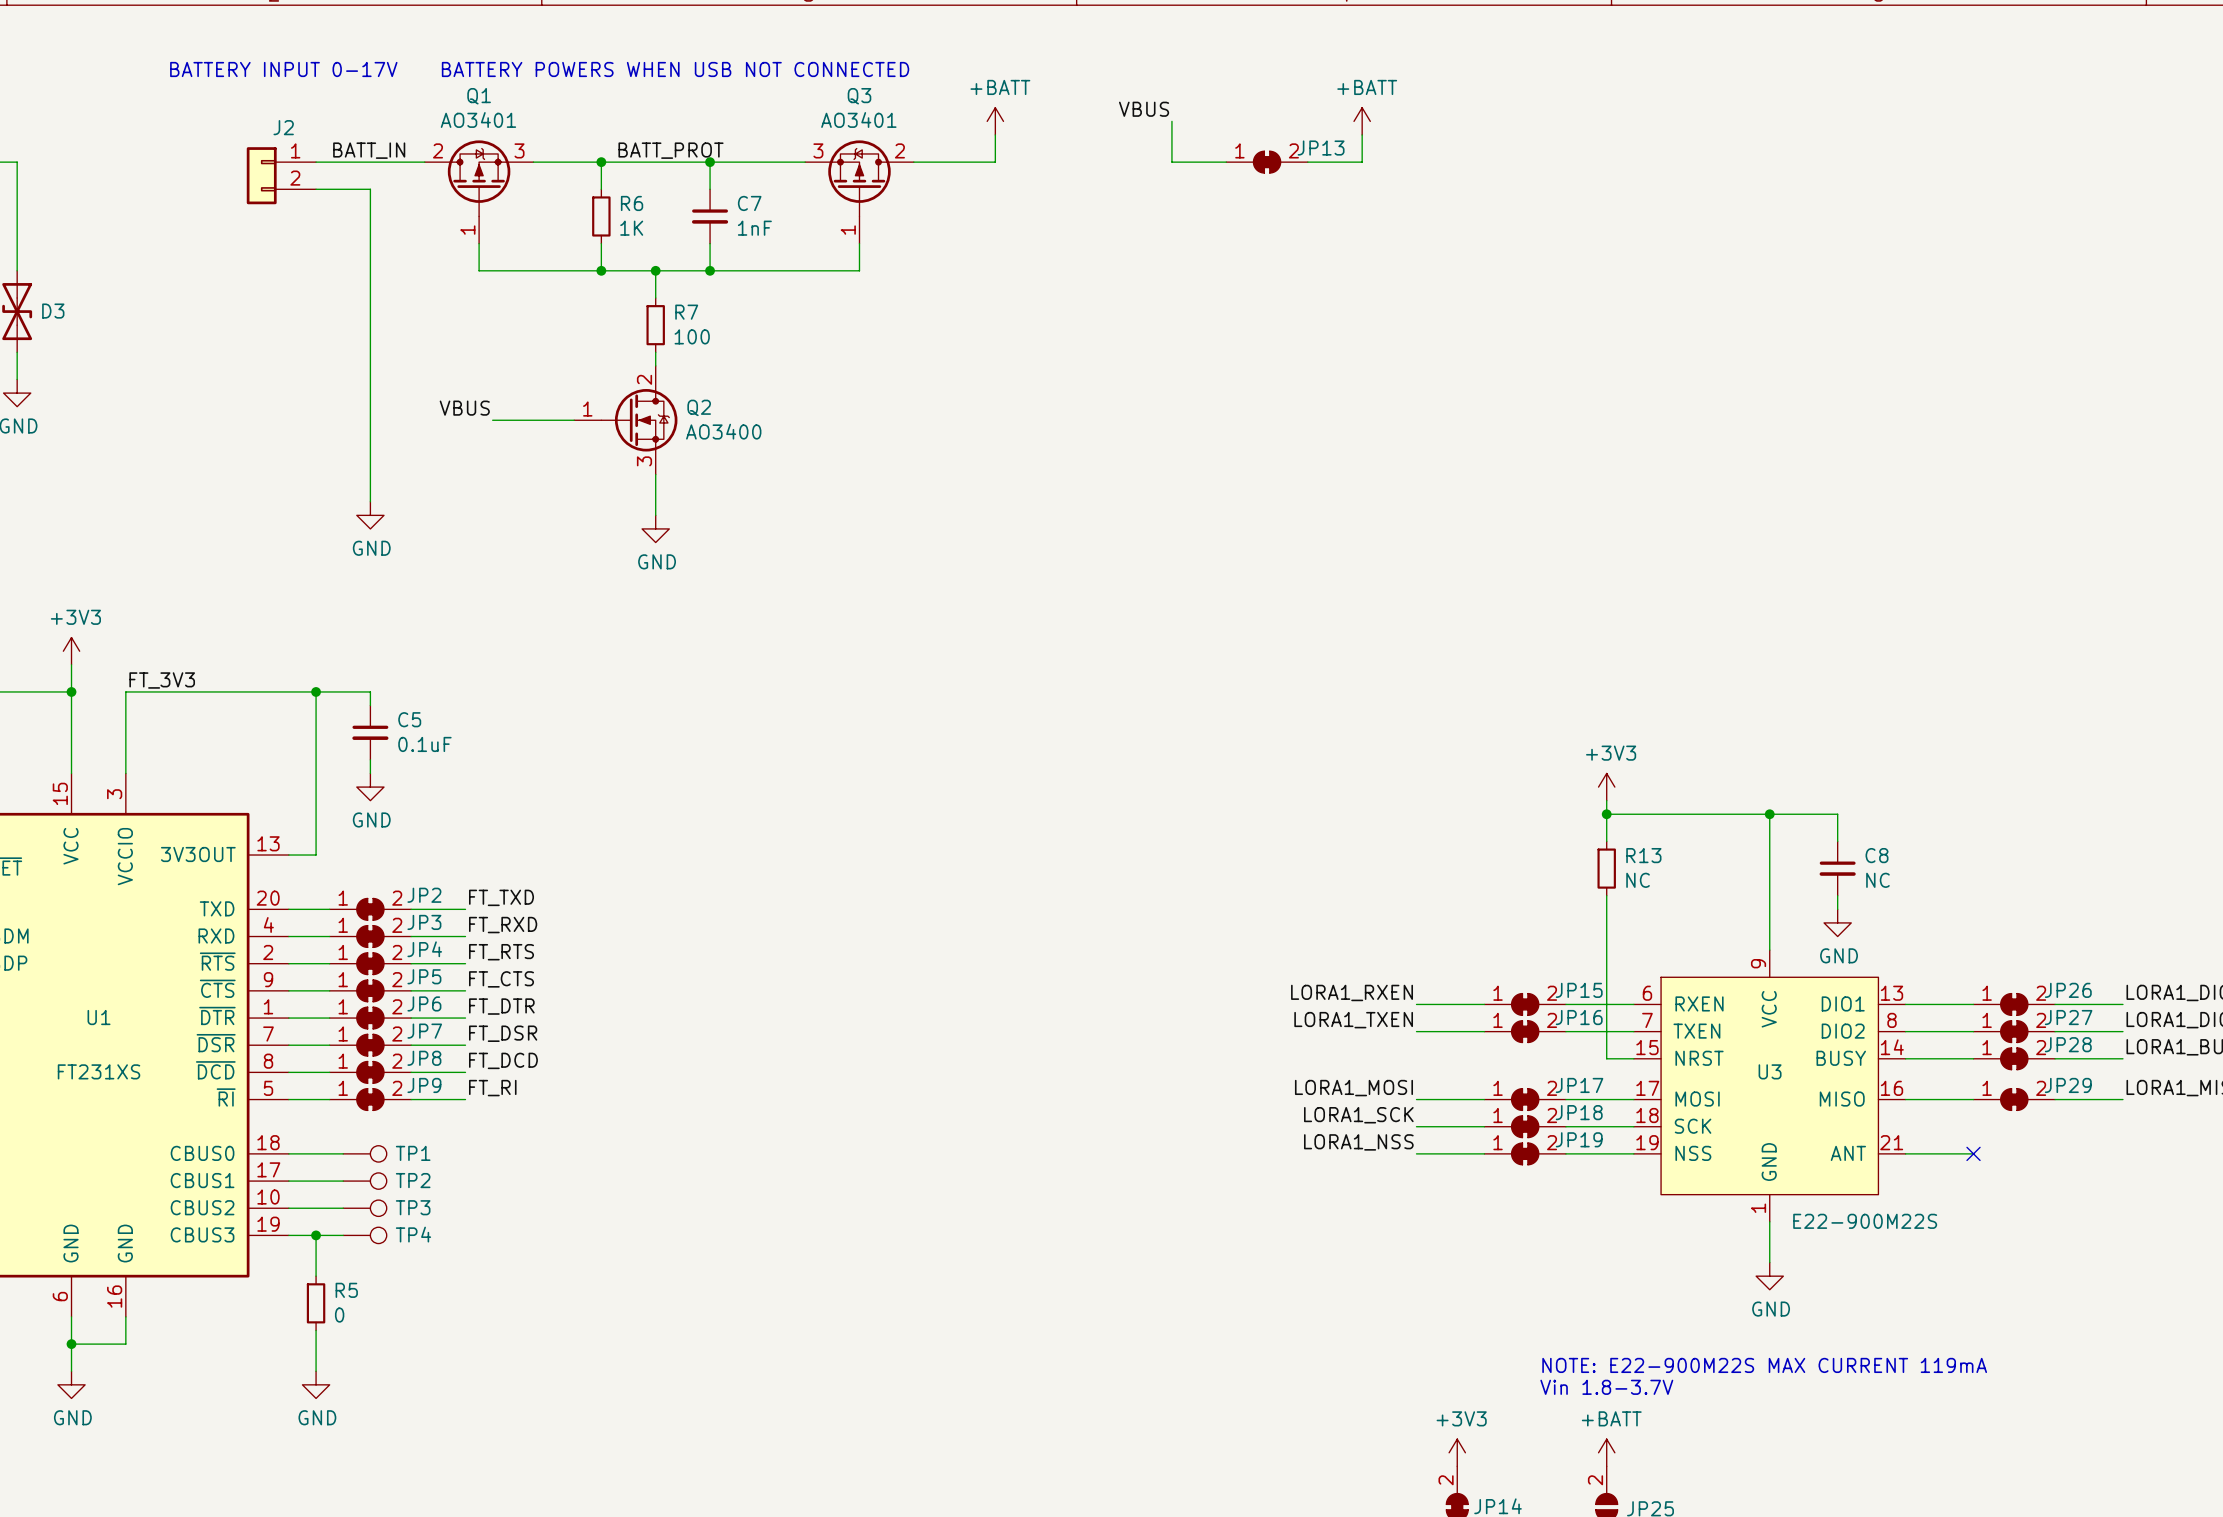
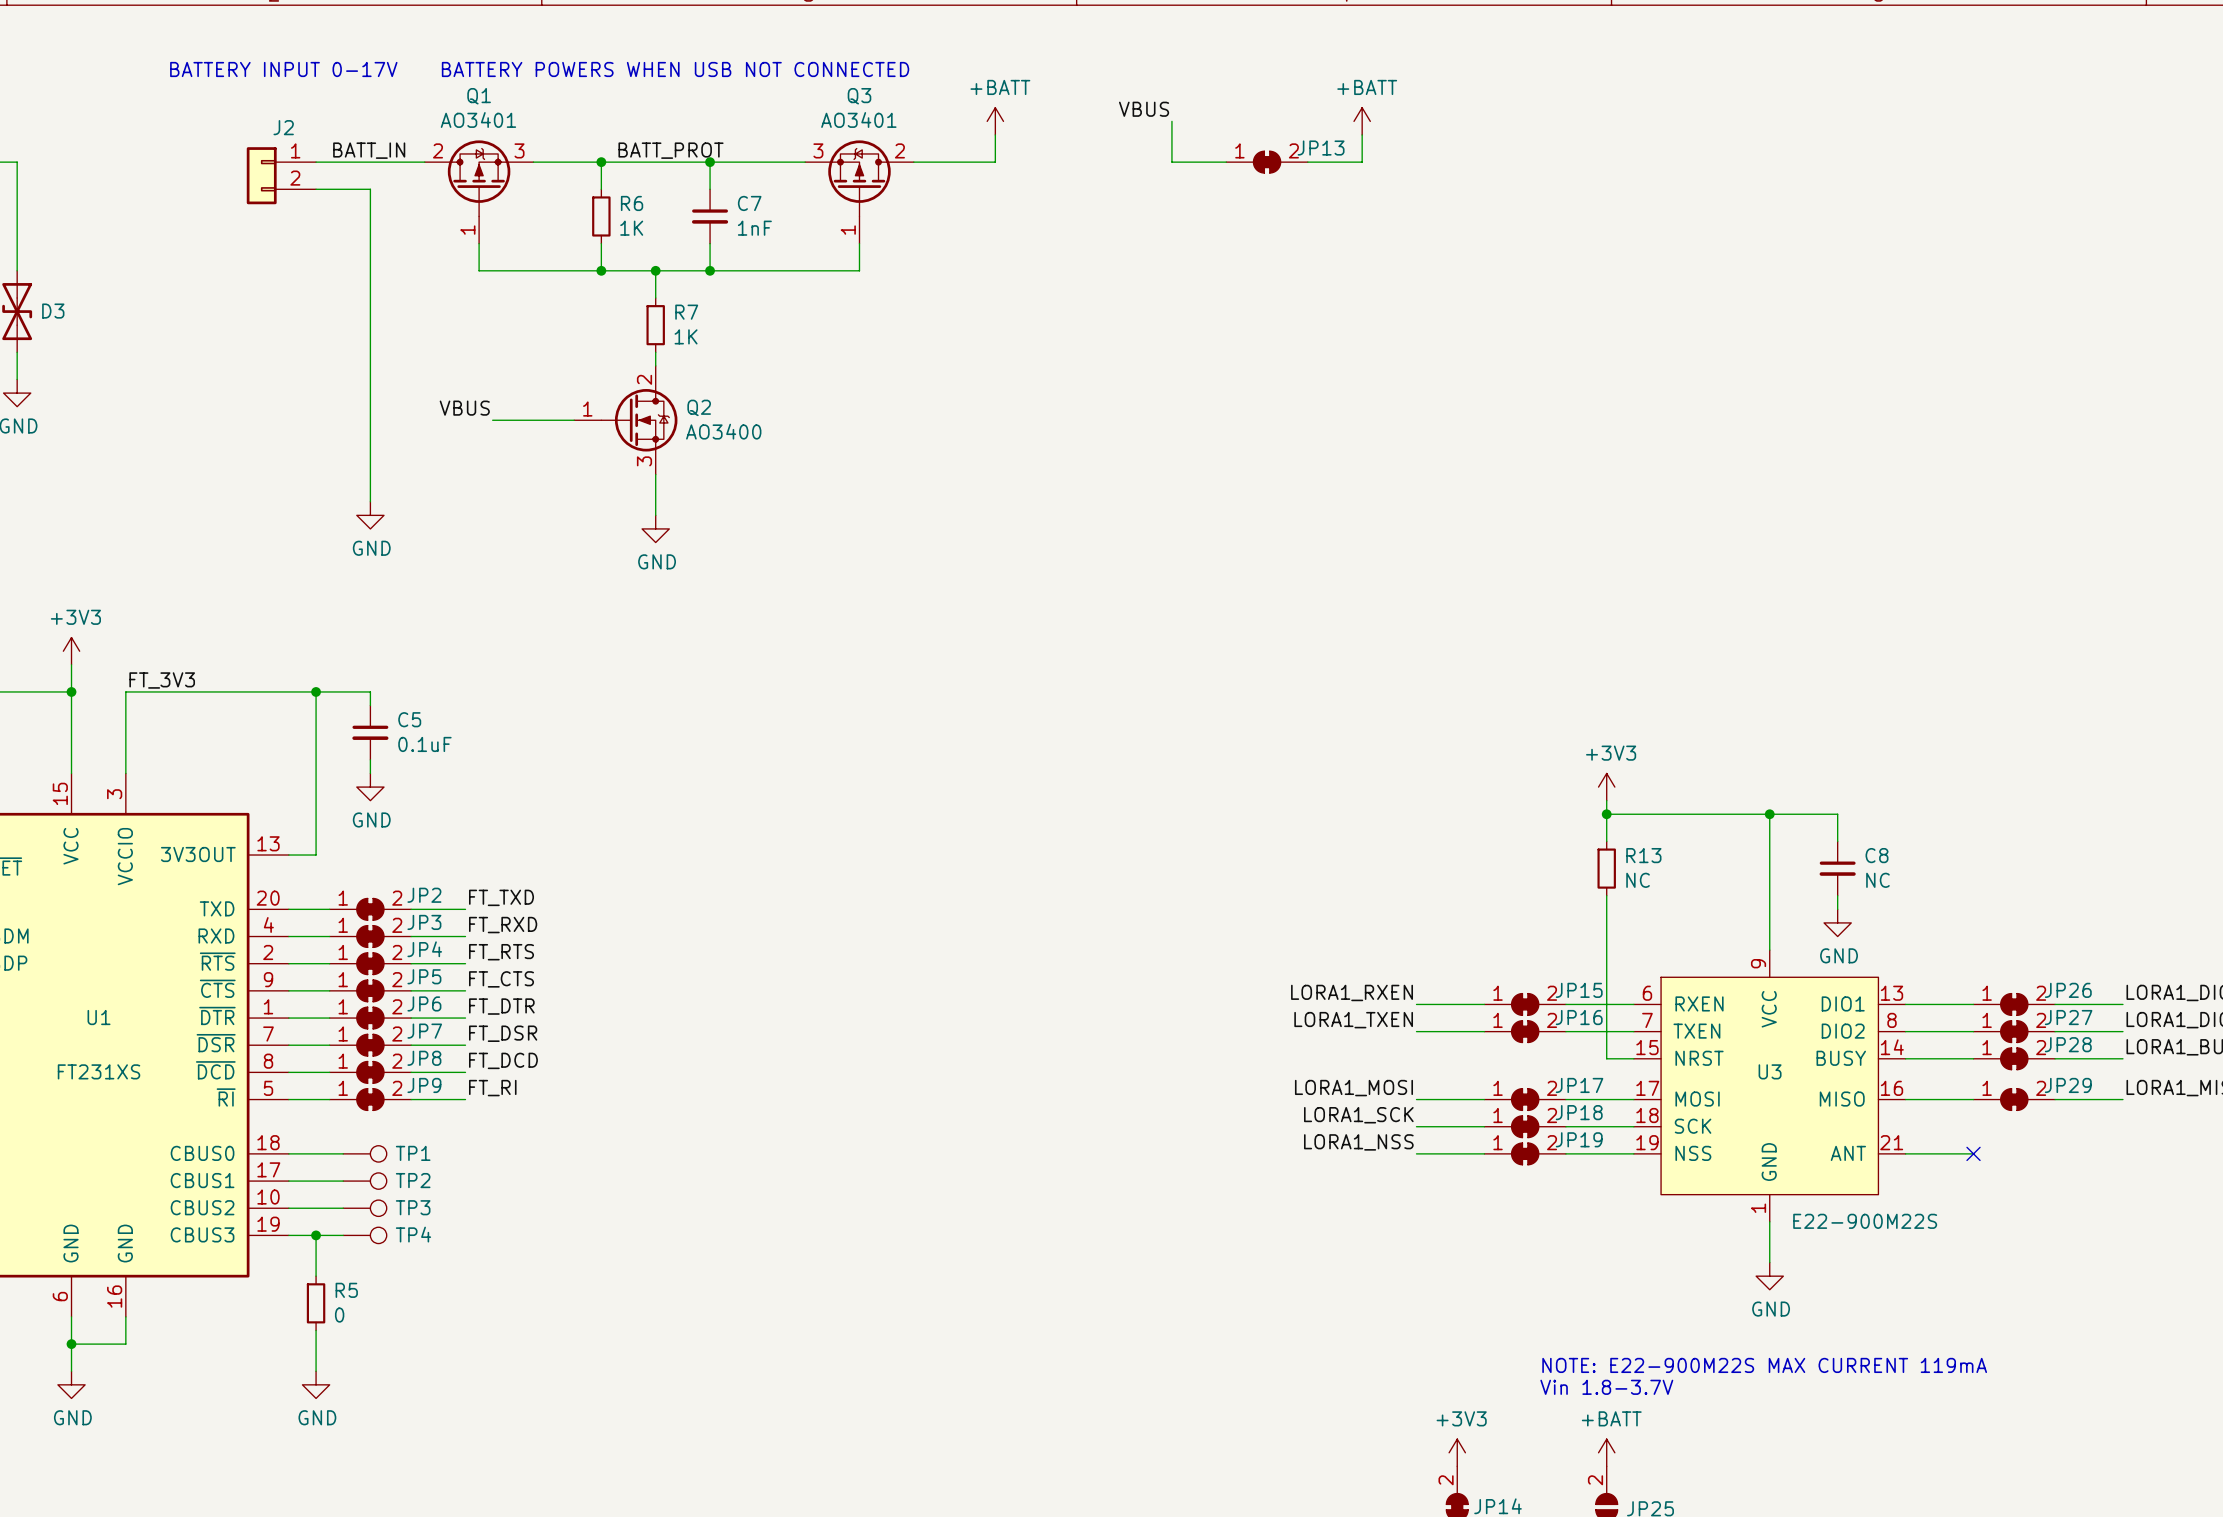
R7 value: 100 (692, 336) -> 1K (686, 336)

